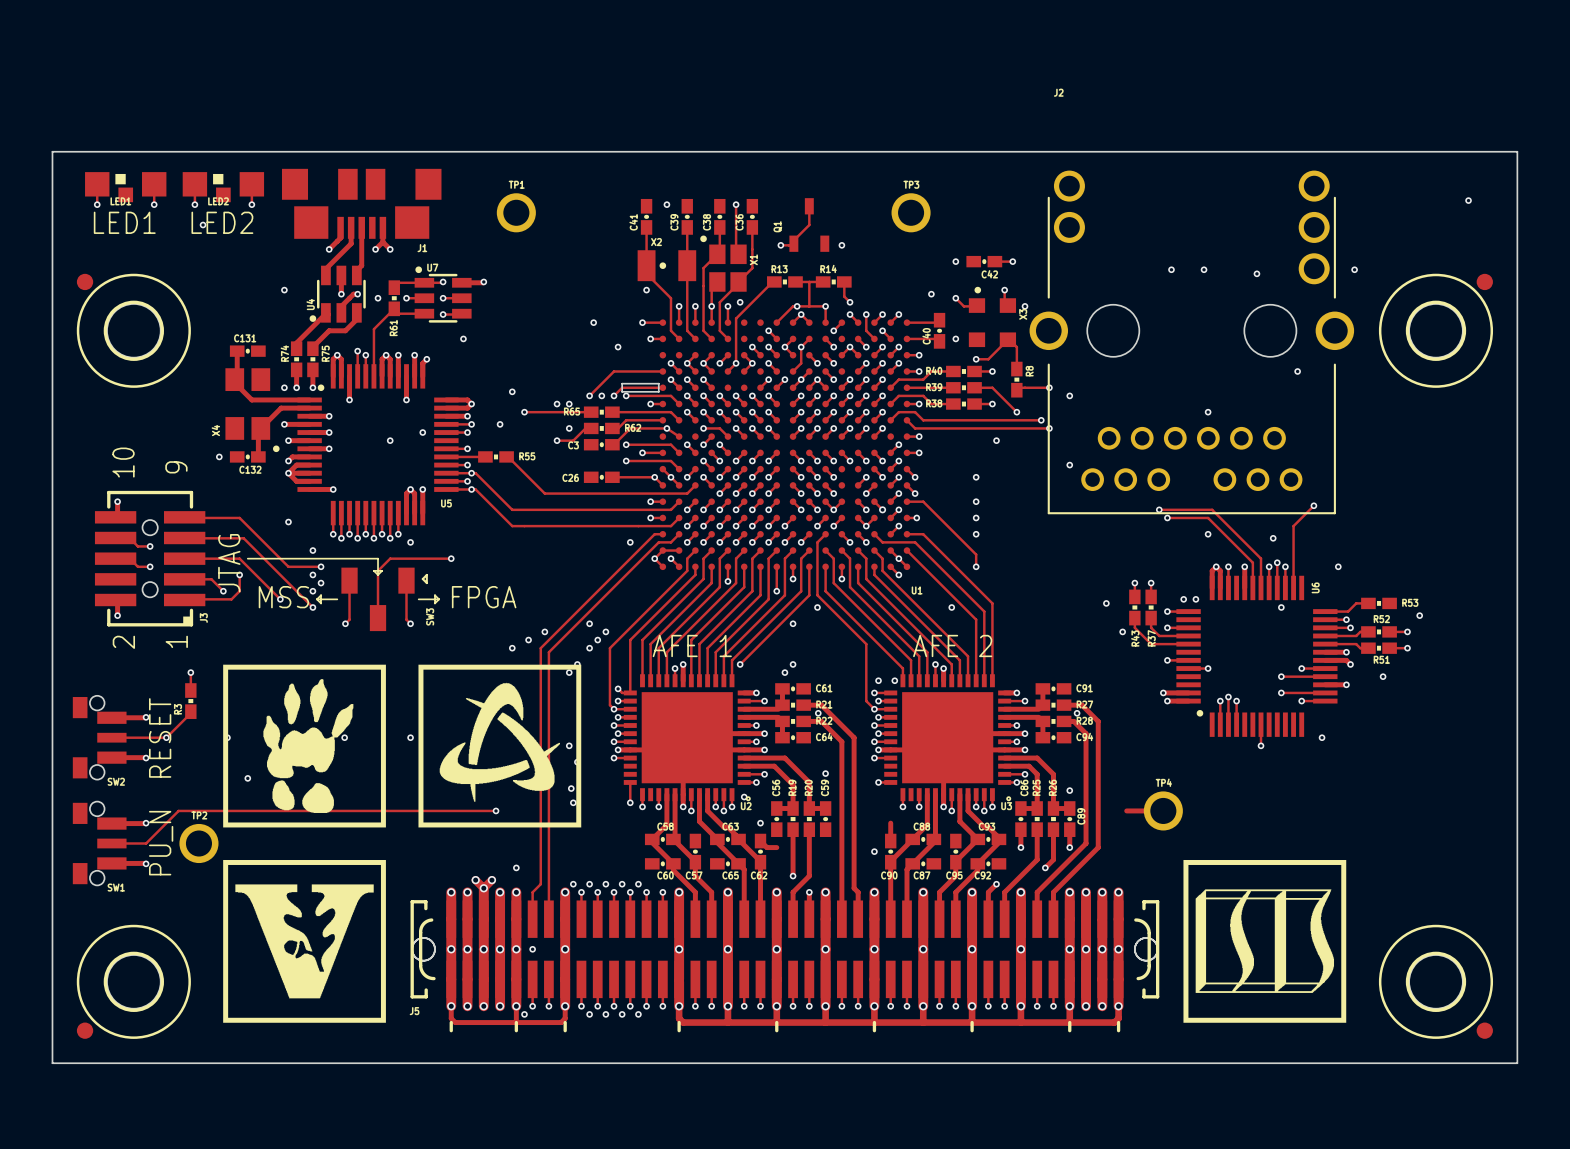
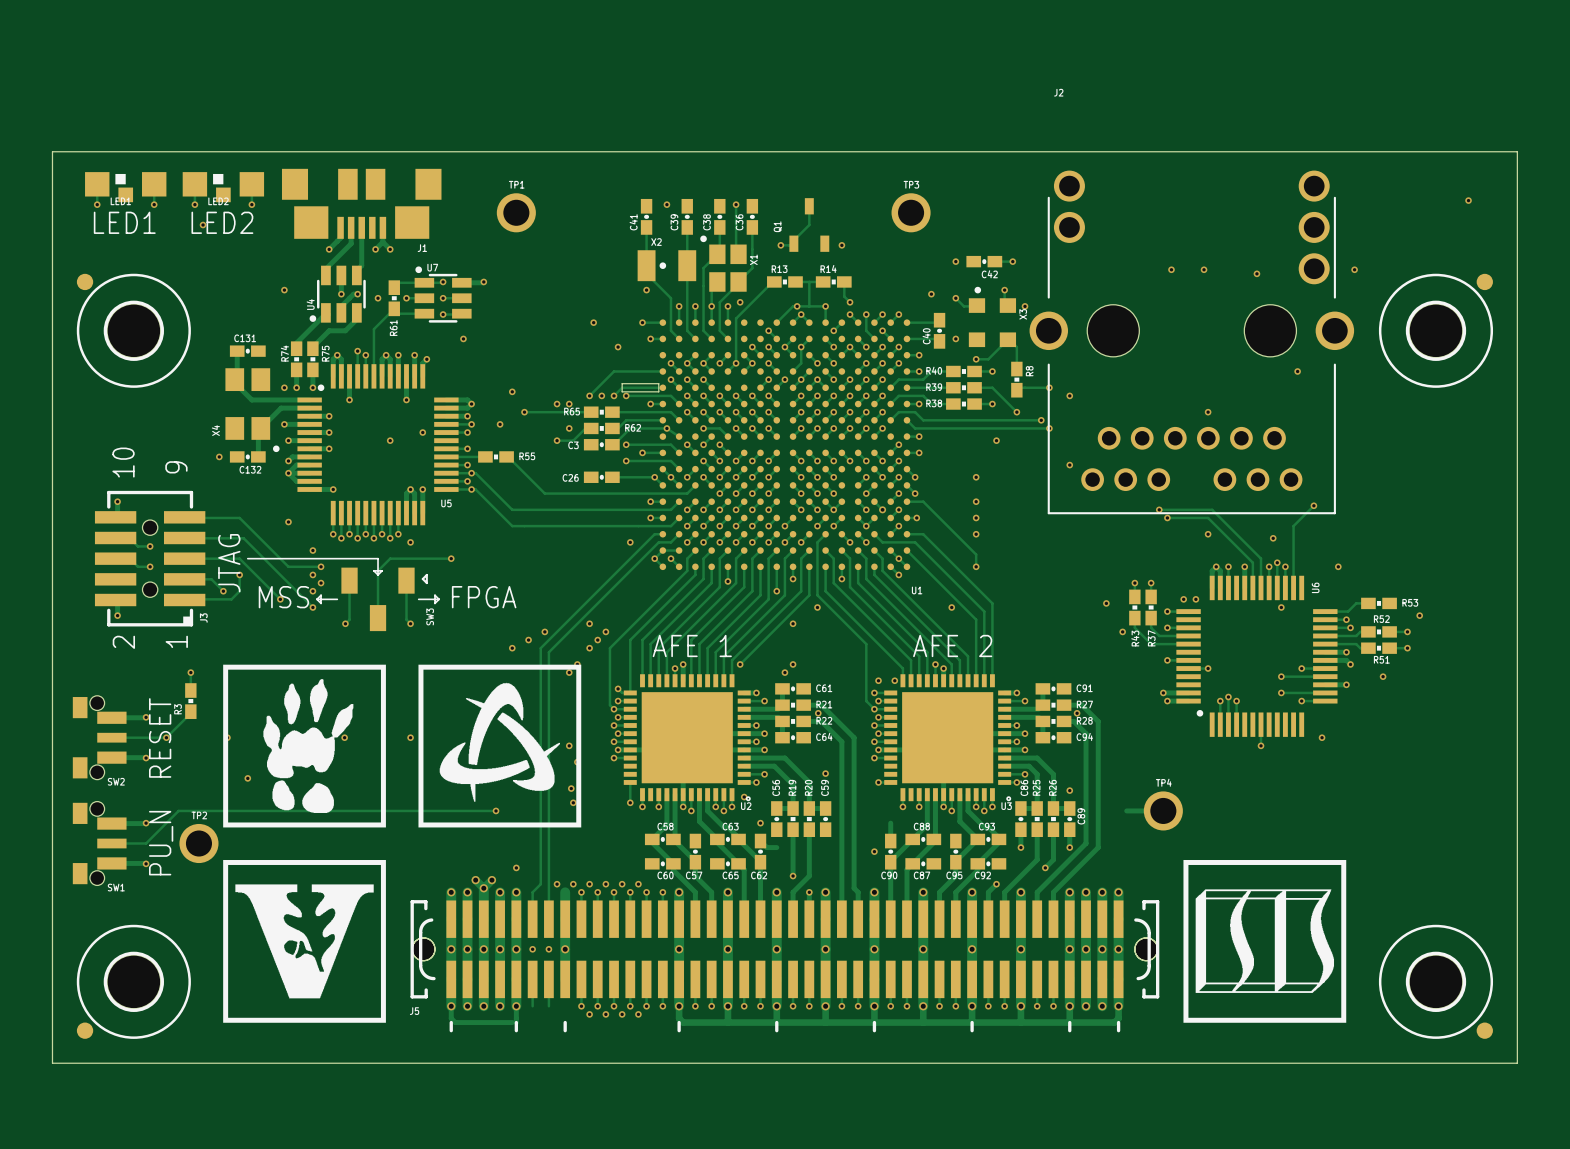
via: none -> (557, 884)
via: (565, 892) -> none
via: none -> (548, 949)
track: (565, 979) (565, 1018) (561, 1022) (512, 1022) -> none
via: (532, 1006) -> none
via: (548, 1006) -> none
via: (565, 1006) -> none
via: (524, 1014) -> none

